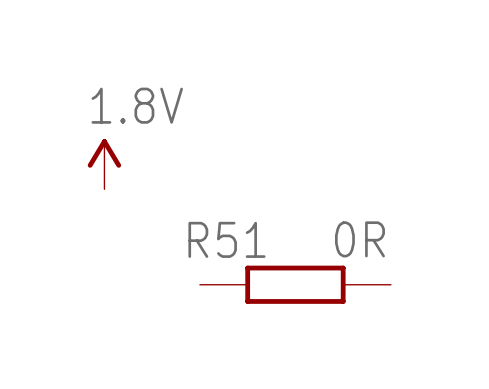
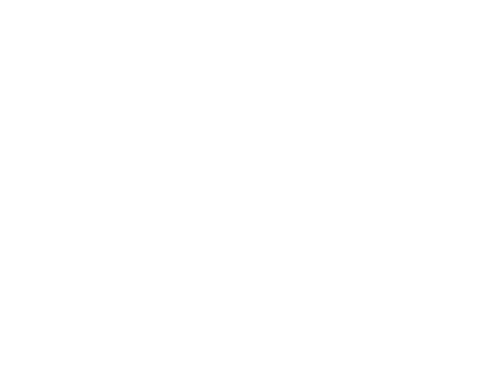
power symbol: 1.8V (104, 164) -> none
R51: 0R (295, 284) -> none

